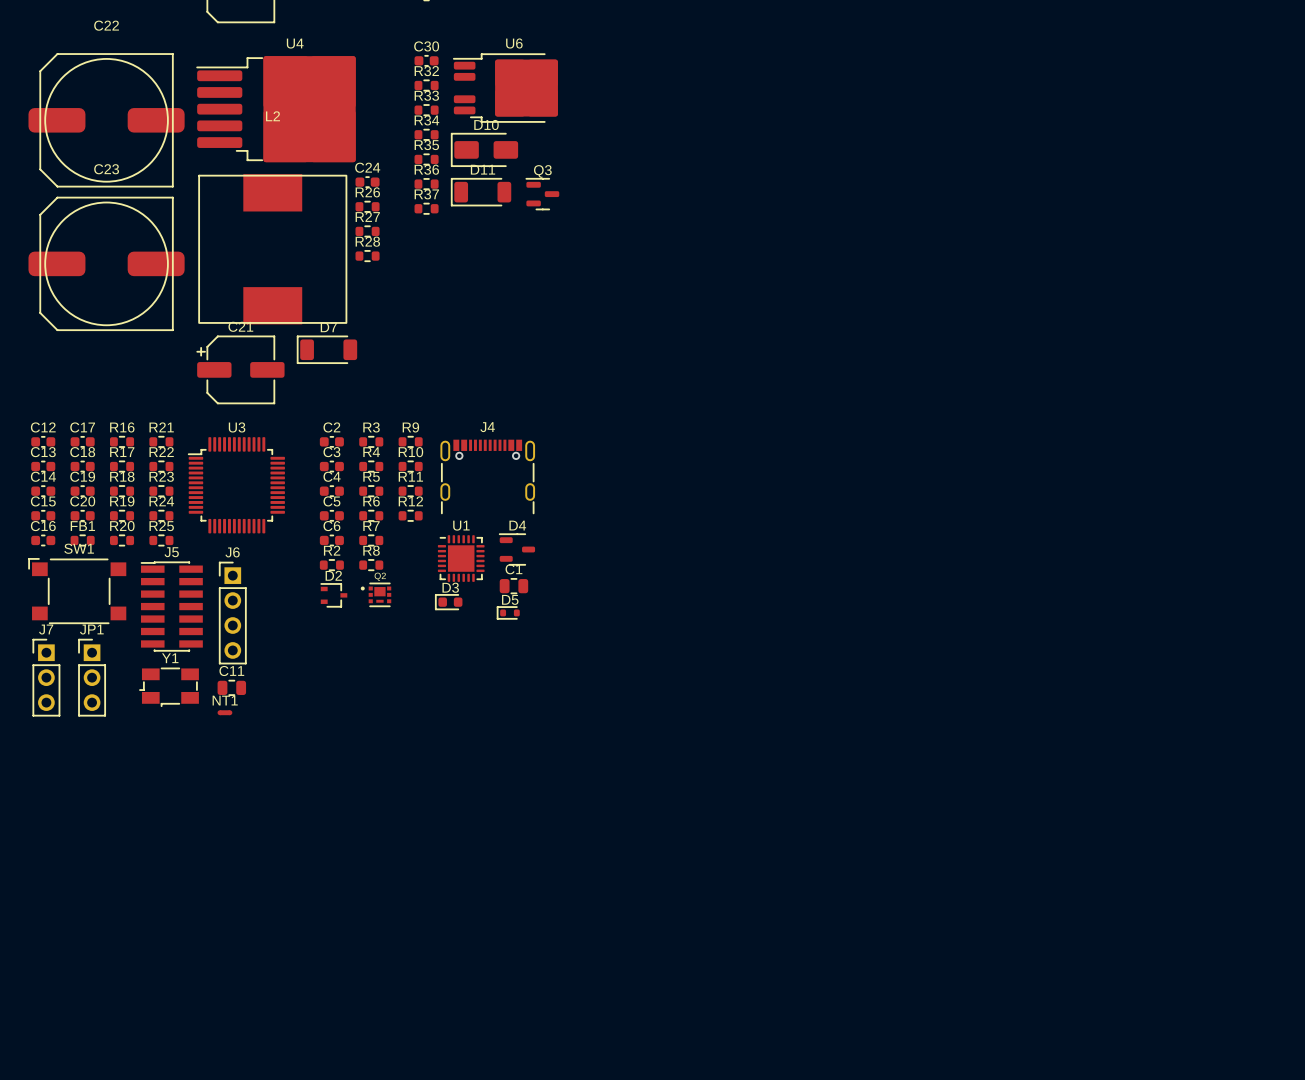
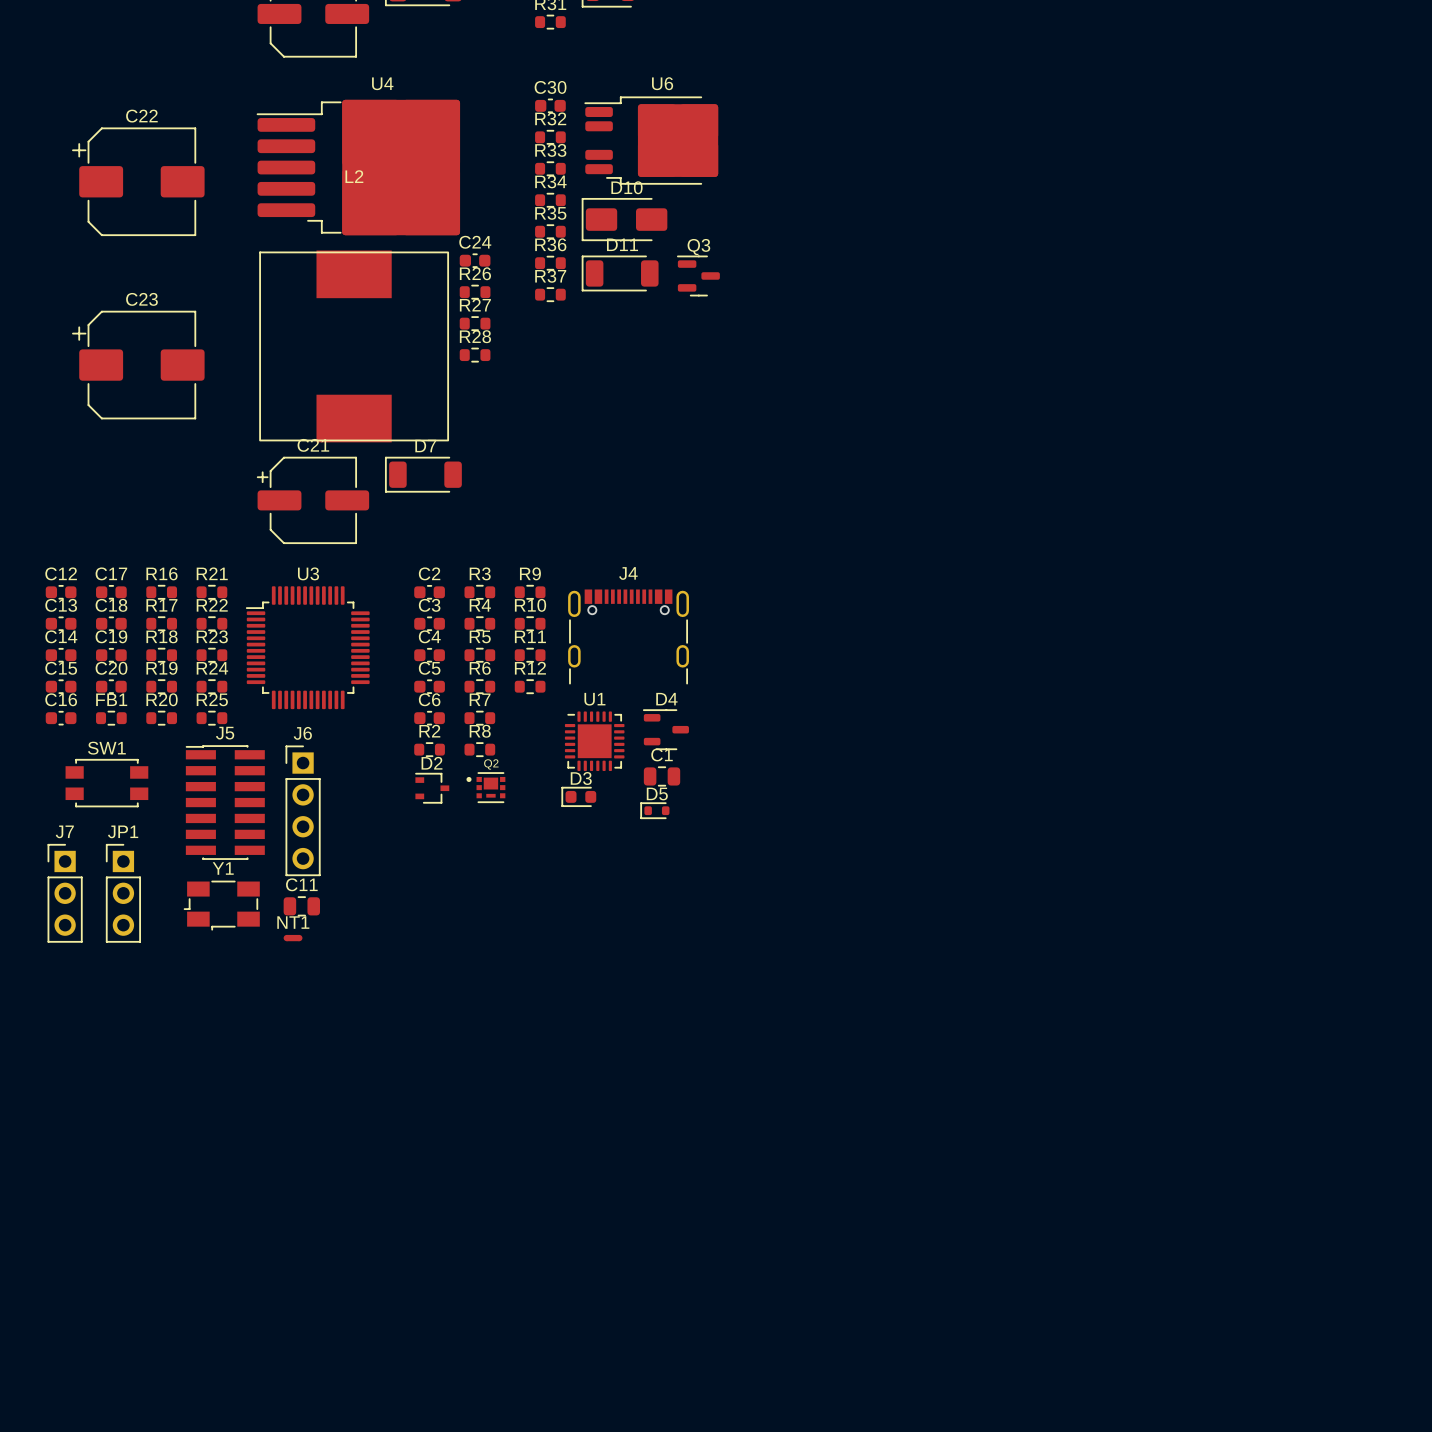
C22 name position: C22 (106, 25) -> C22 (141, 116)
C22 footprint: [28, 53, 185, 188] -> [72, 127, 205, 236]
C23 name position: C23 (106, 169) -> C23 (141, 299)
C23 footprint: [28, 197, 185, 331] -> [72, 310, 205, 420]
SW1 footprint: [28, 558, 127, 624] -> [65, 759, 149, 808]

